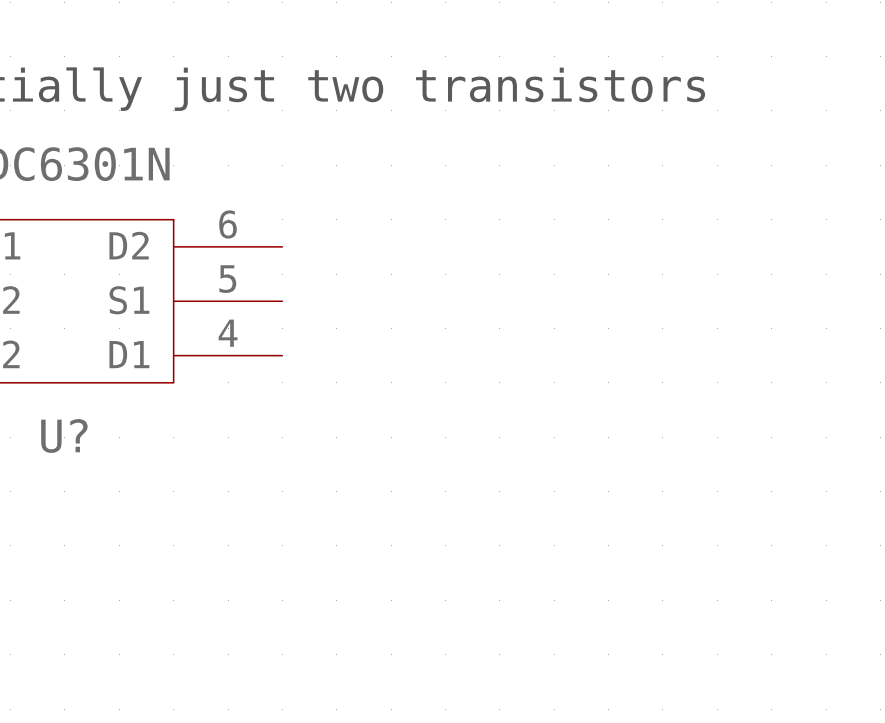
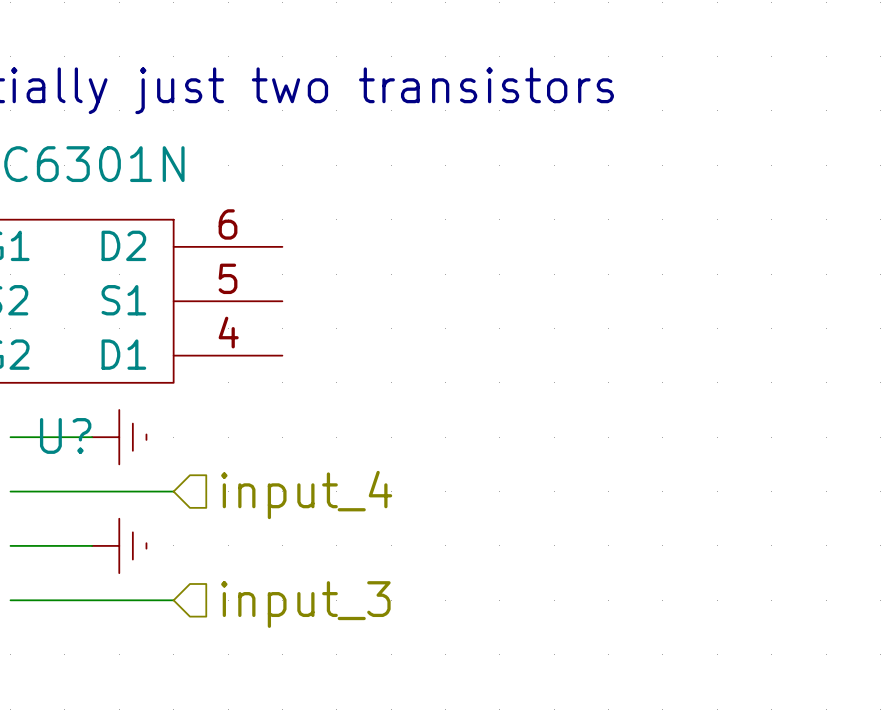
wire: none -> (10, 437) (92, 437)
power symbol: none -> (119, 437)
wire: none -> (10, 491) (173, 491)
hierarchical label: none -> input_4 (306, 495)
wire: none -> (10, 545) (92, 545)
power symbol: none -> (119, 545)
wire: none -> (10, 600) (173, 600)
hierarchical label: none -> input_3 (305, 604)

